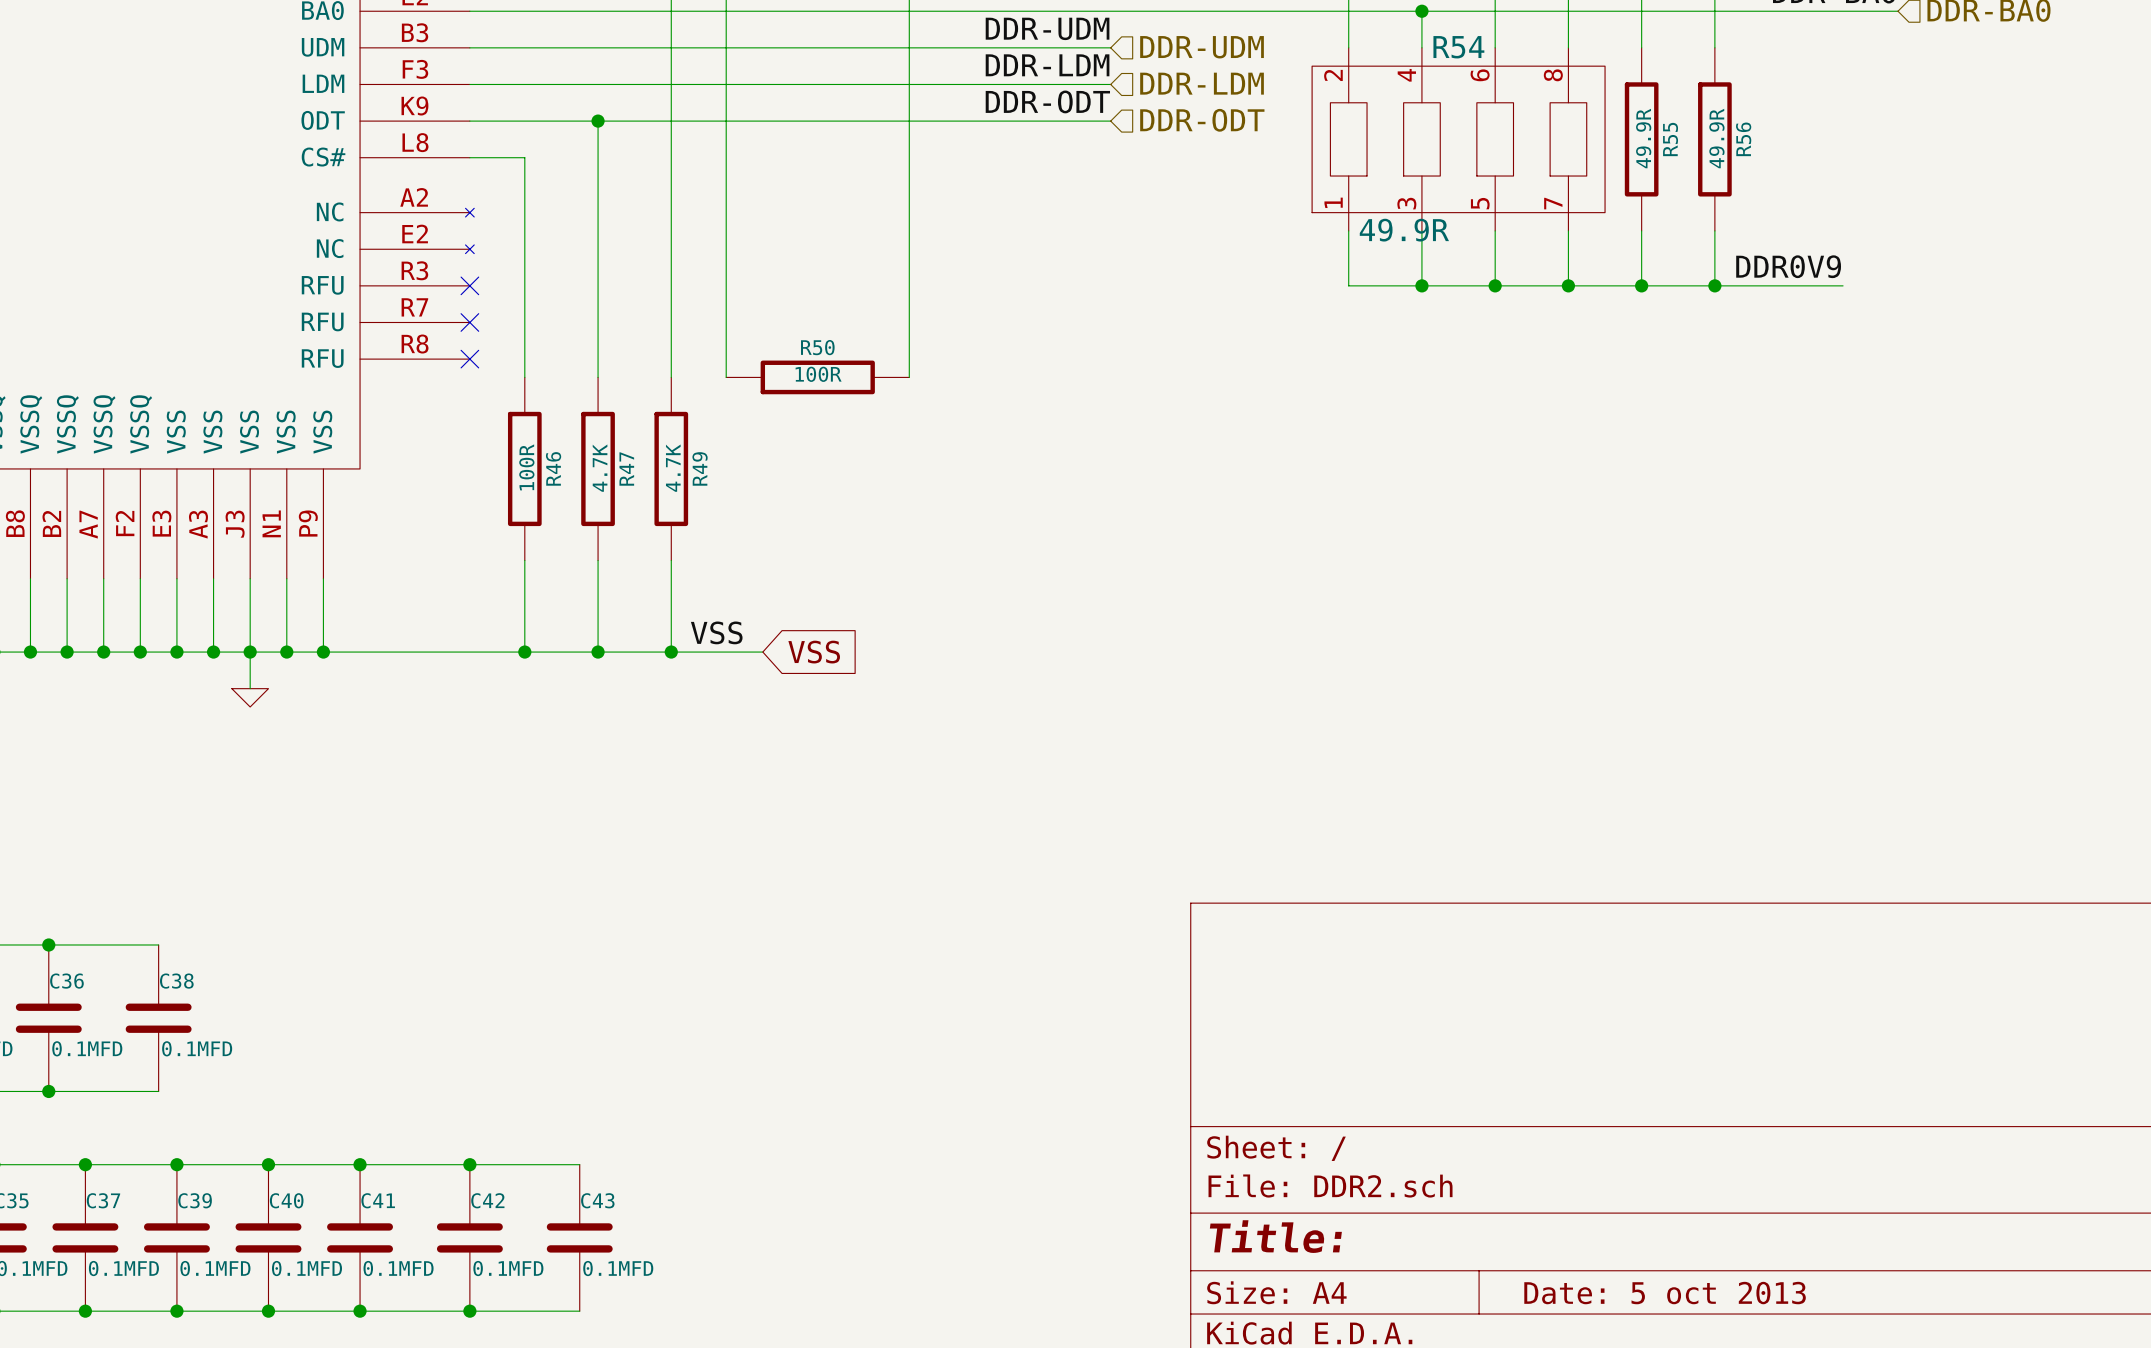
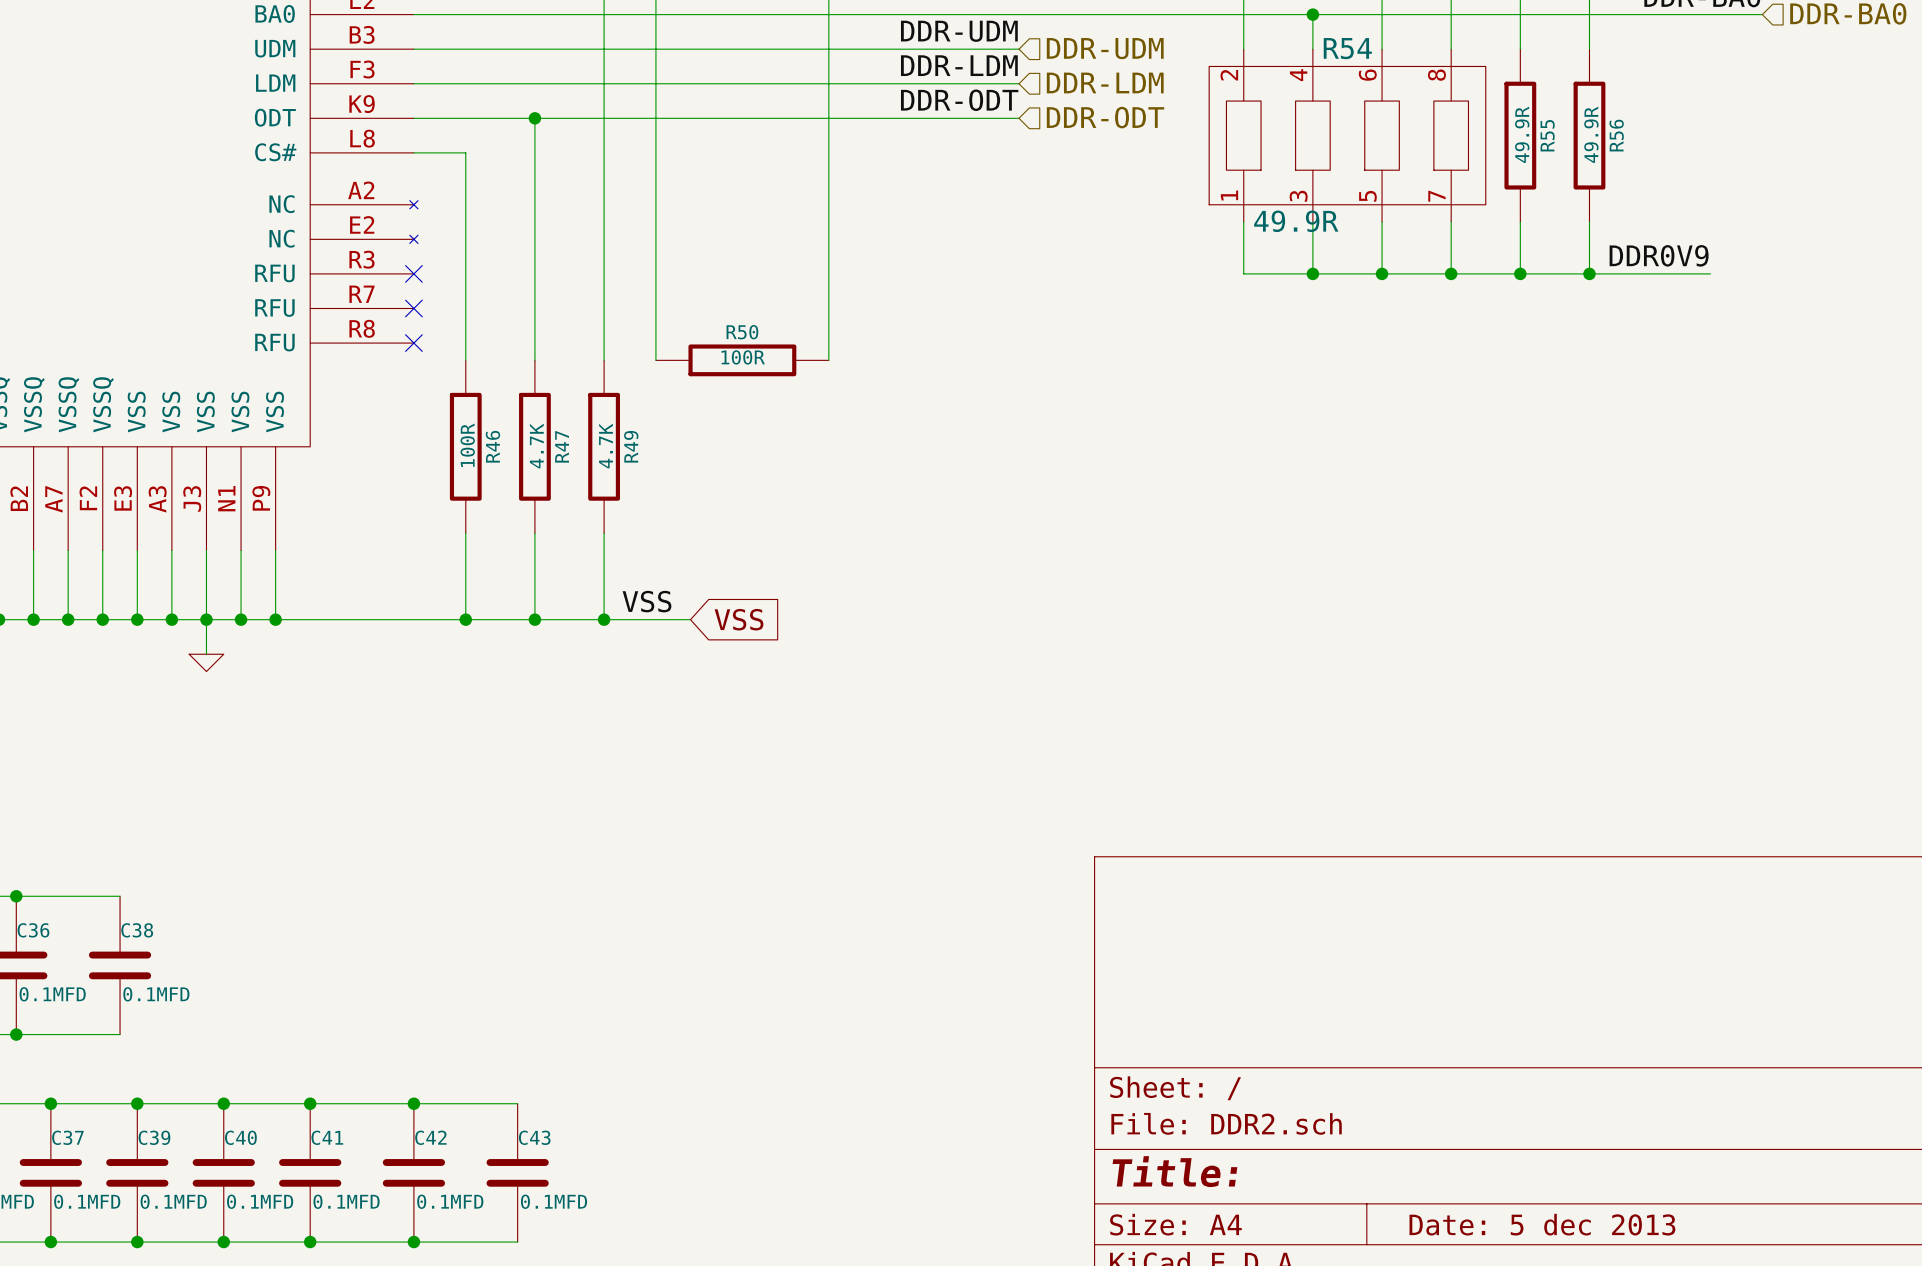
title block: Date: 5 oct 2013 (1665, 1293) -> Date: 5 dec 2013 (1542, 1224)

